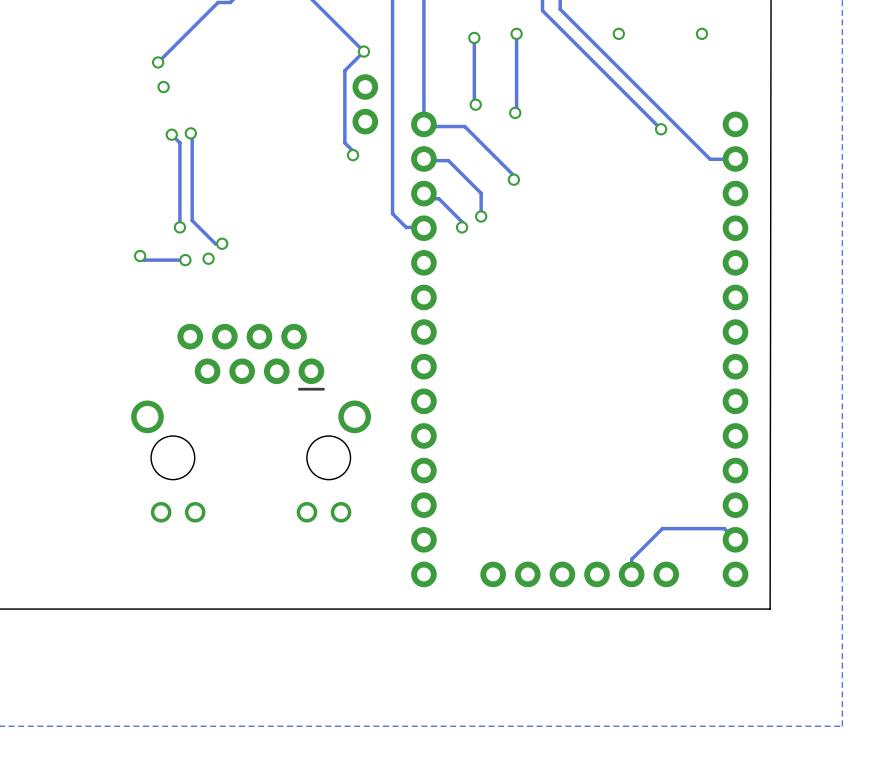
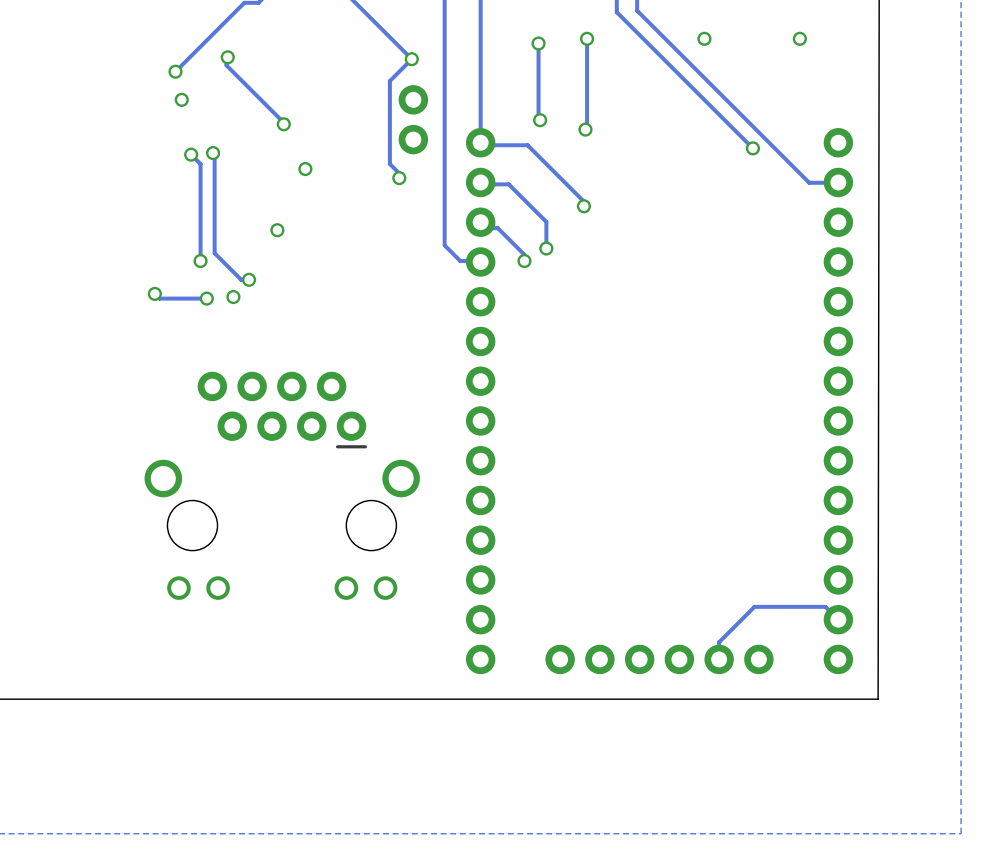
track: none -> (227, 57) (226, 65) (283, 124)
via: none -> (227, 57)
via: none -> (283, 124)
via: none -> (305, 169)
via: none -> (277, 230)

